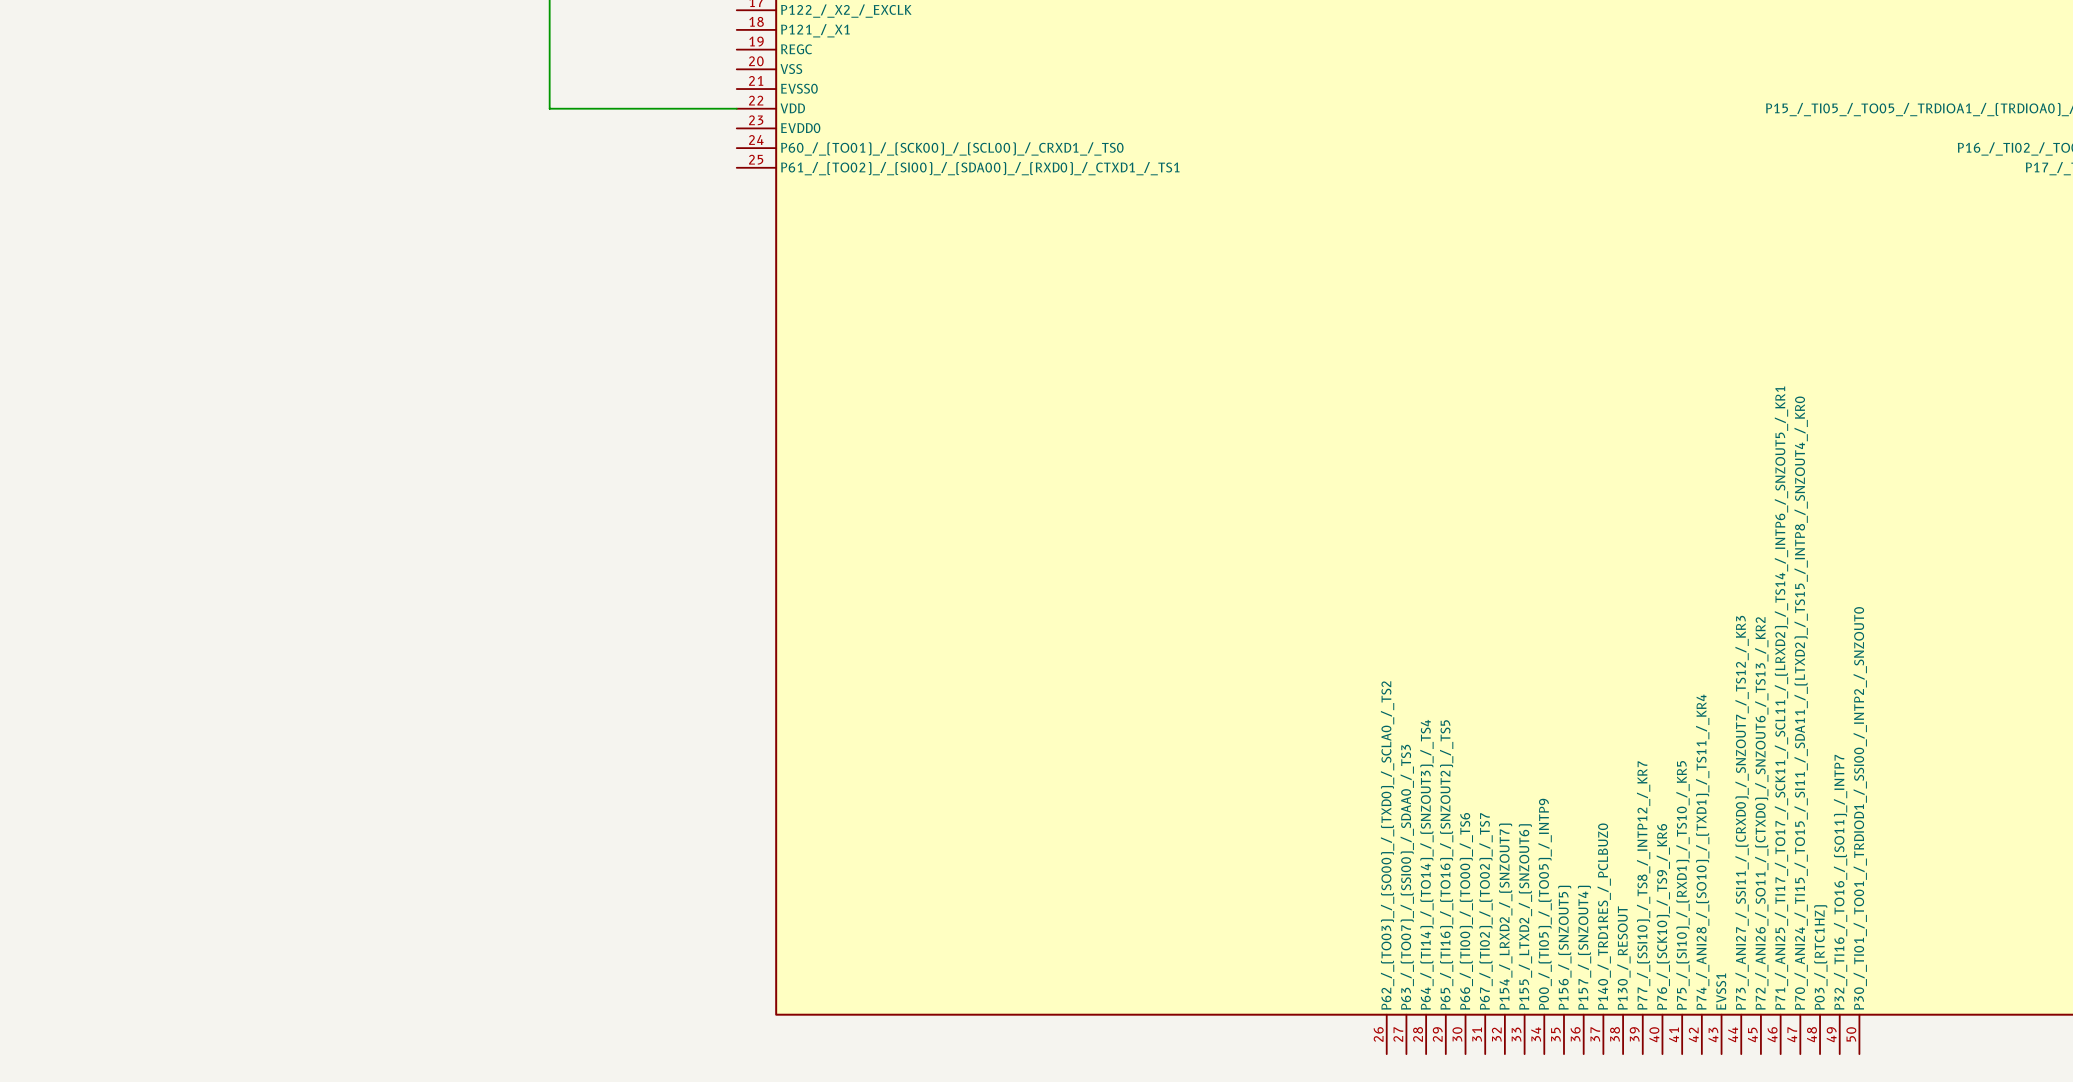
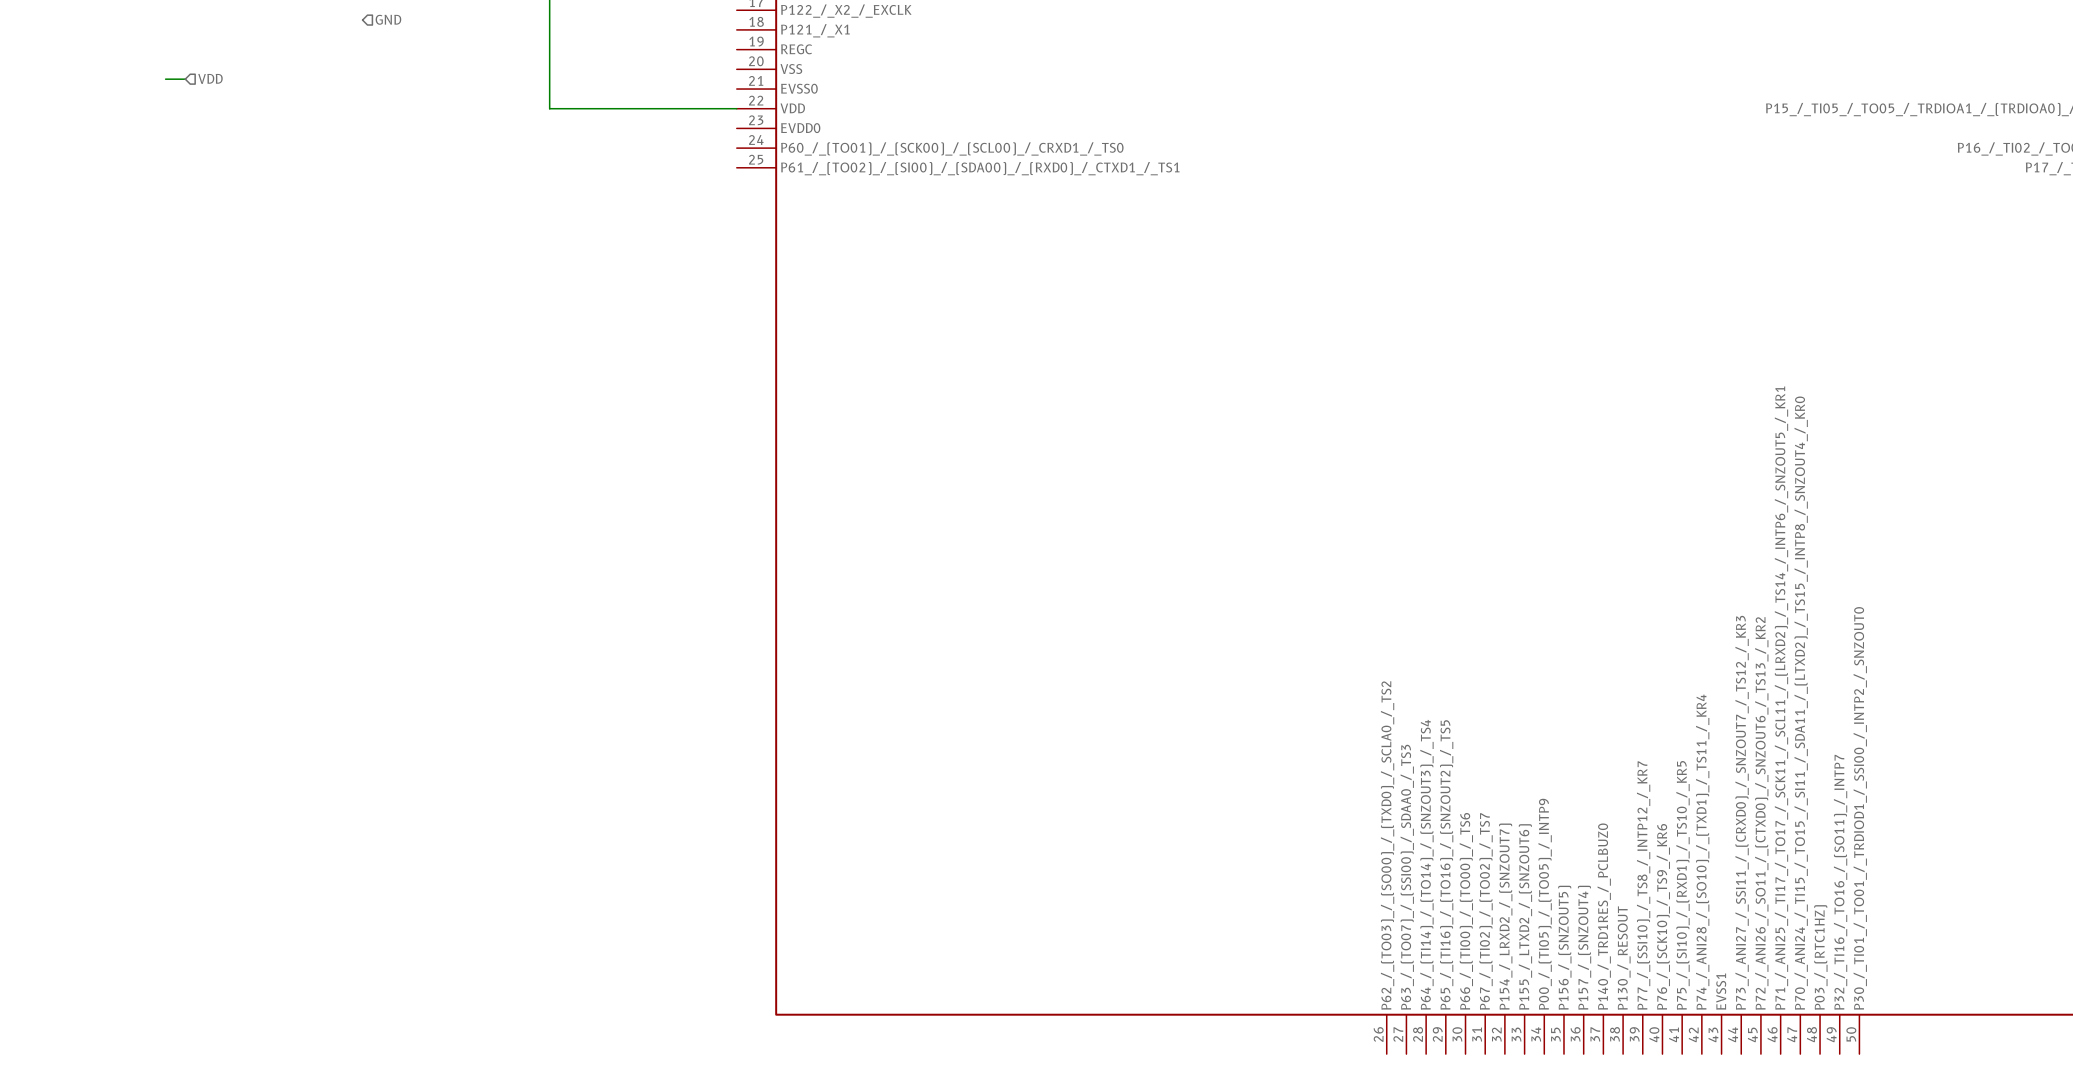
hierarchical label: none -> GND (388, 19)
hierarchical label: none -> VDD (210, 78)
wire: none -> (165, 79) (185, 79)

